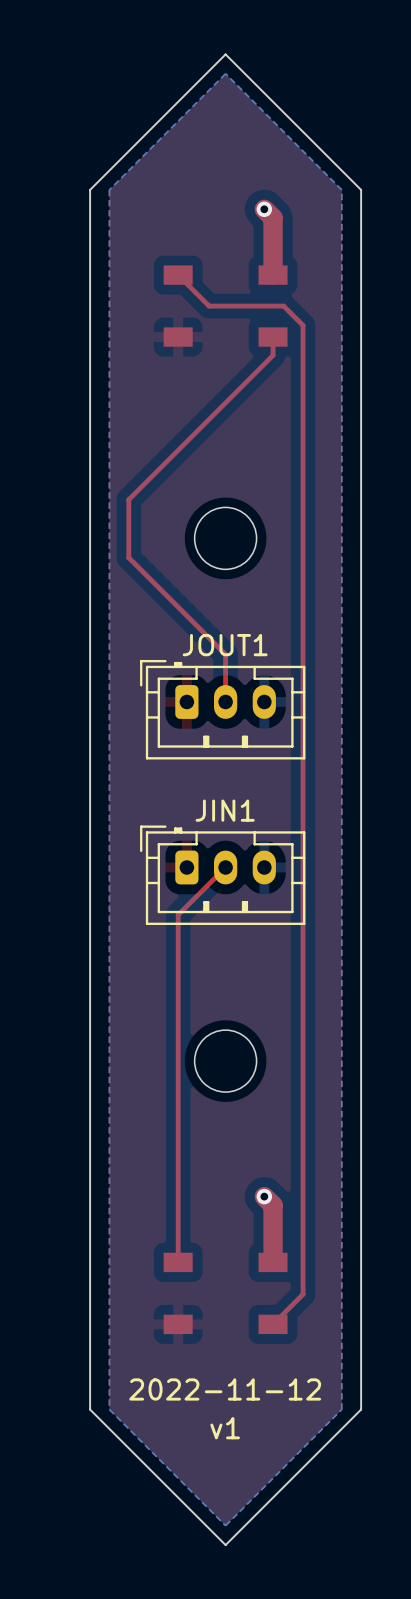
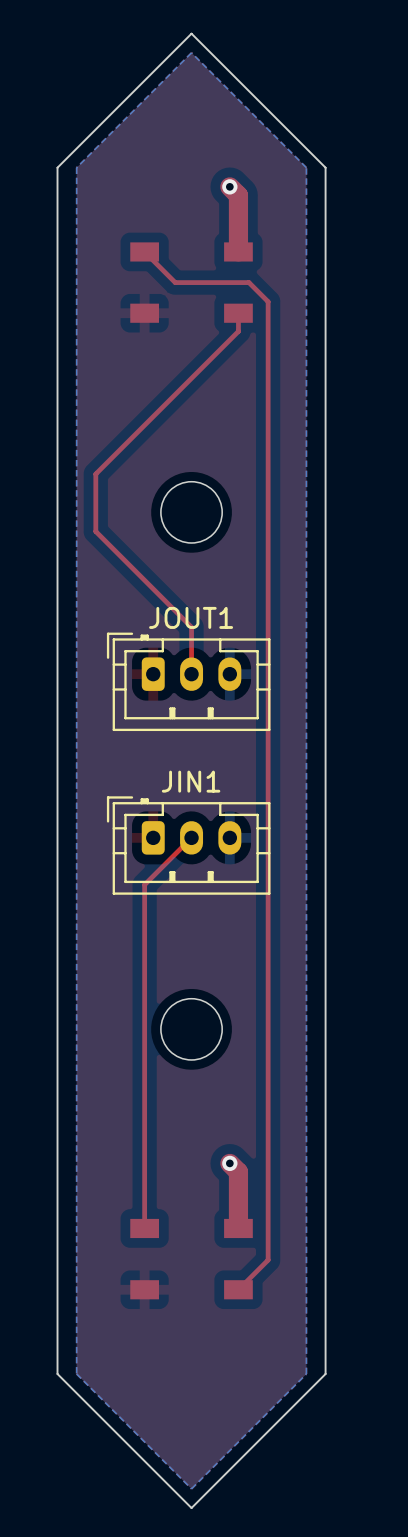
text: 2022-11-12 (225, 1389) -> none
text: v1 (225, 1428) -> none

